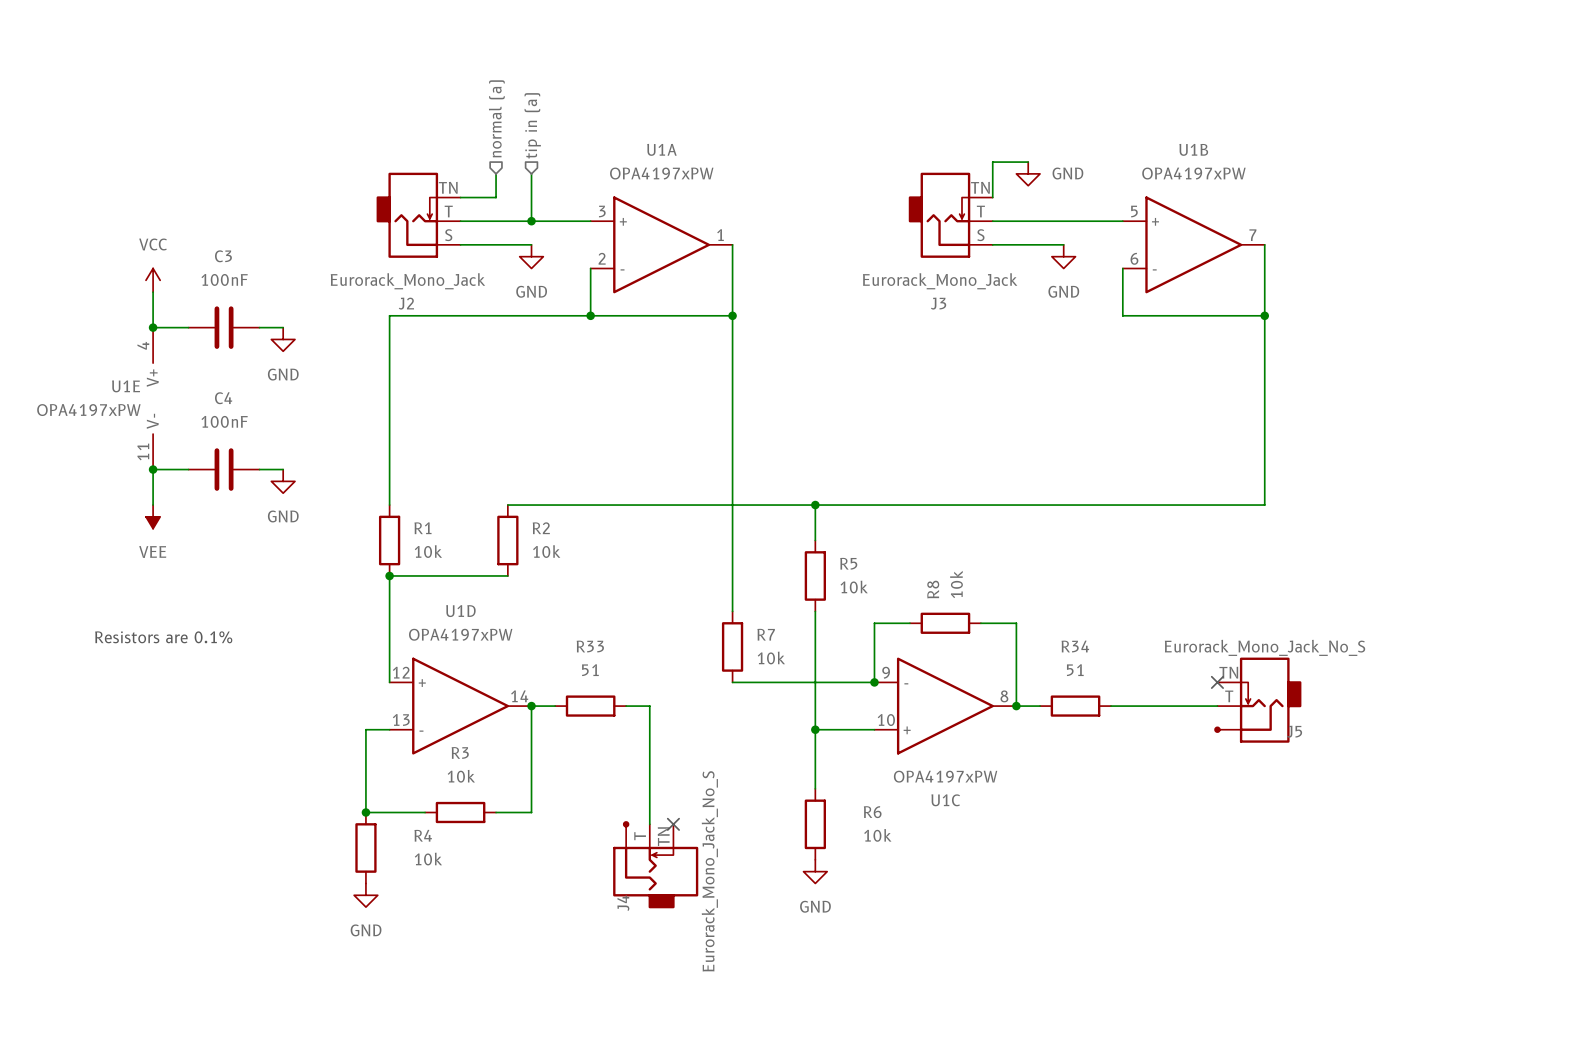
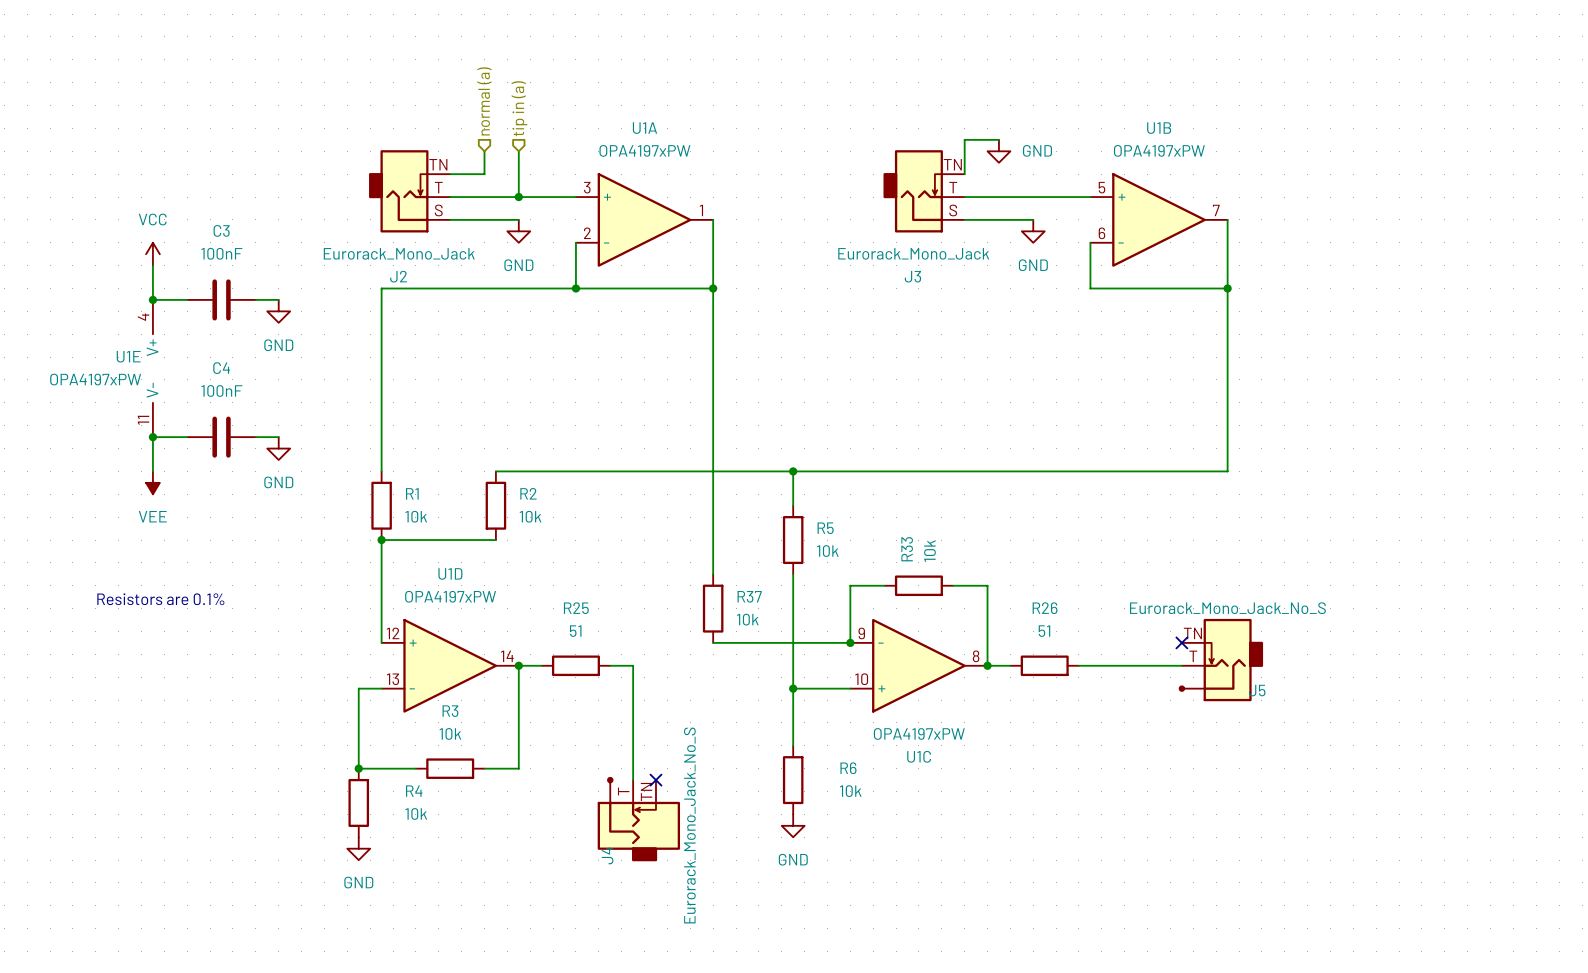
R8 name: R8 (933, 589) -> R33 (907, 549)
R7 name: R7 (766, 634) -> R37 (749, 596)
R33 name: R33 (590, 646) -> R25 (576, 608)
R34 name: R34 (1075, 646) -> R26 (1045, 608)

